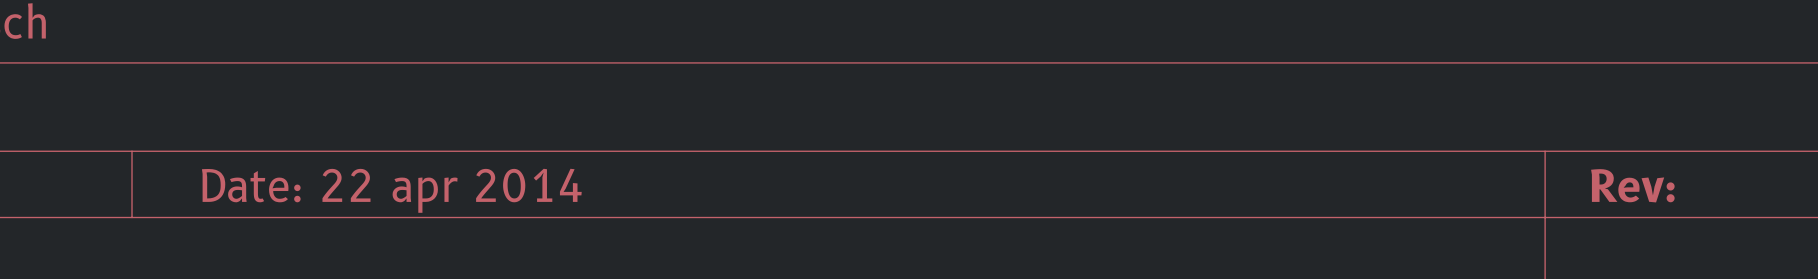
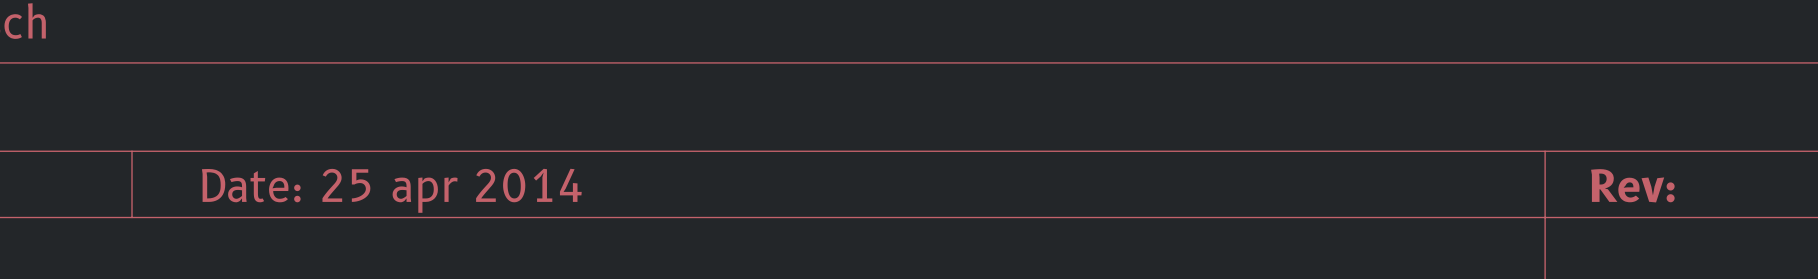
title block: Date: 22 apr 2014 (391, 190) -> Date: 25 apr 2014 (391, 190)

